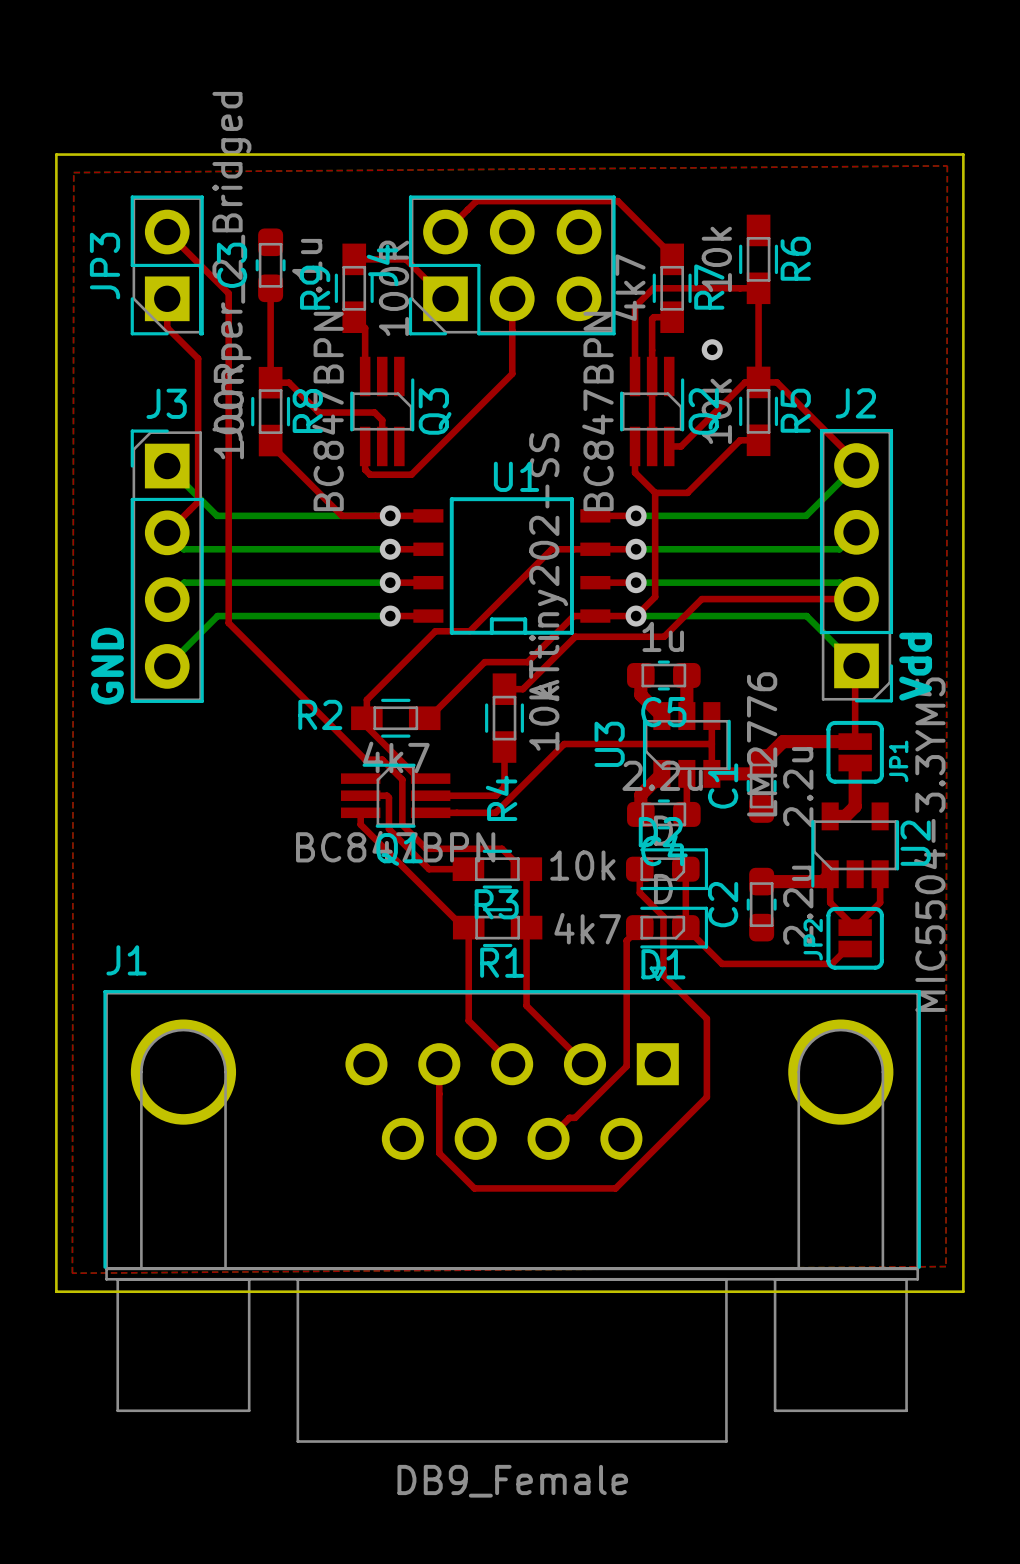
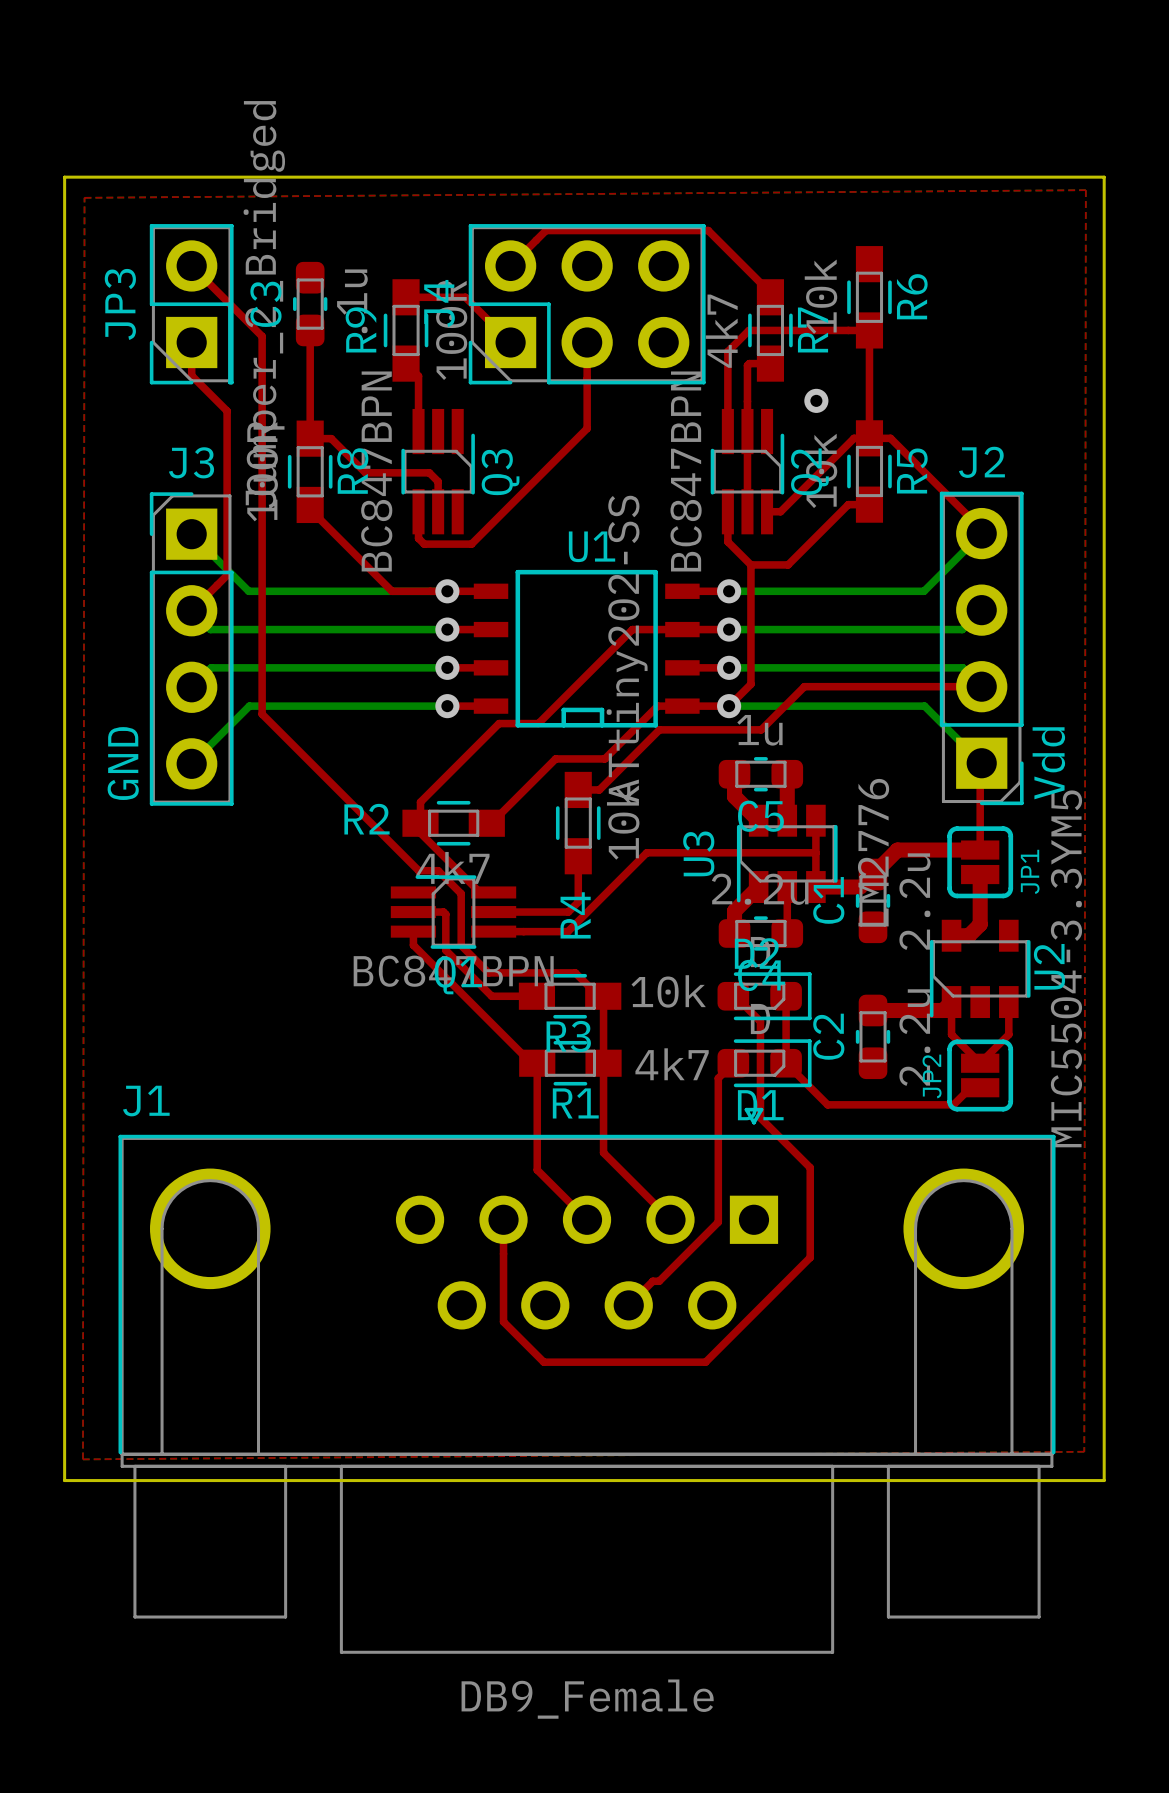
top track: (639, 869) (639, 892) (663, 916) -> (733, 996) (760, 1021) (760, 1050)

